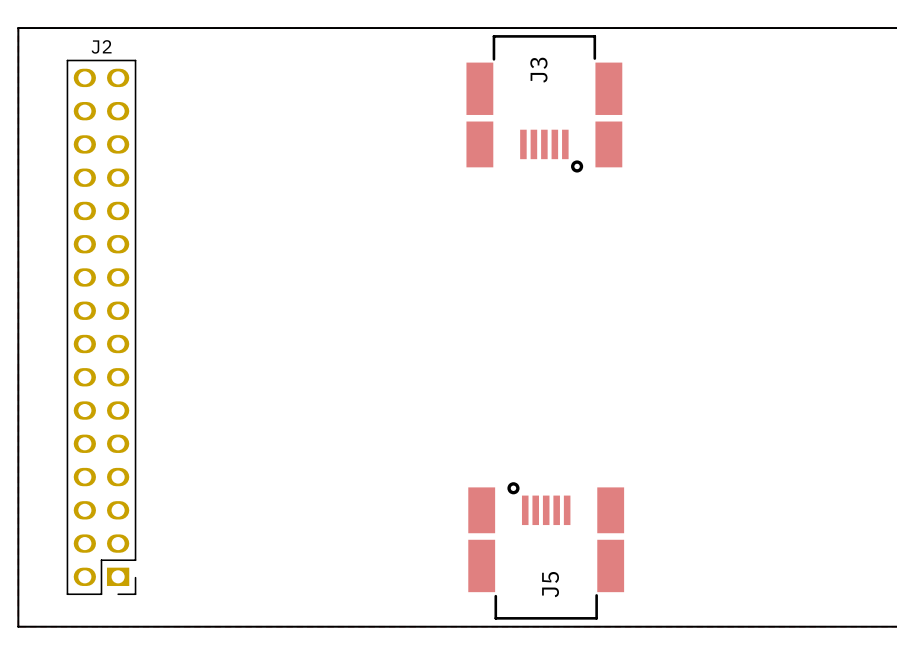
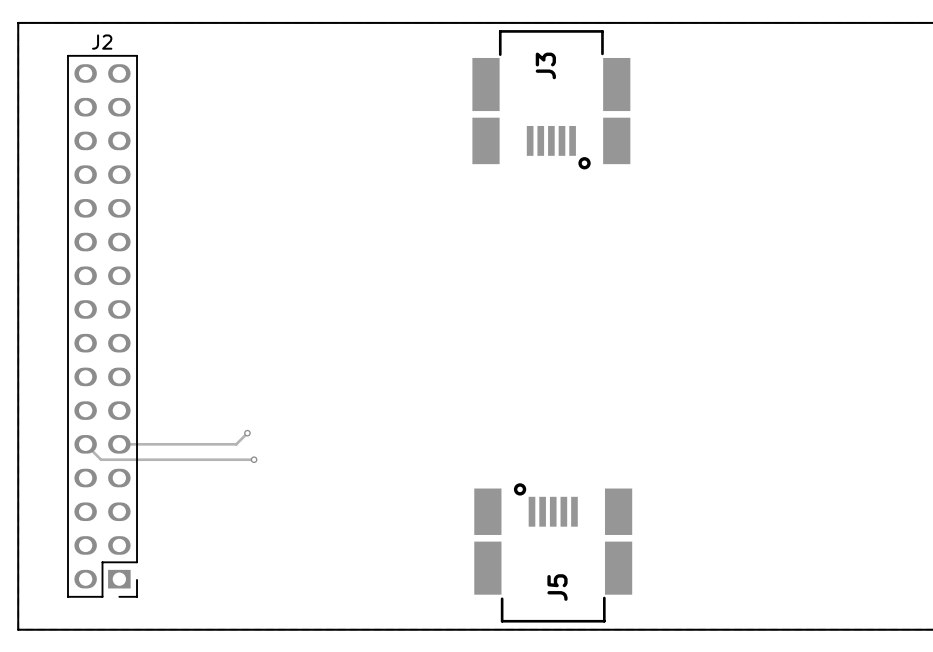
track: none -> (247, 433) (236, 444) (119, 444)
via: none -> (247, 433)
track: none -> (85, 444) (101, 459) (254, 459)
via: none -> (254, 459)

